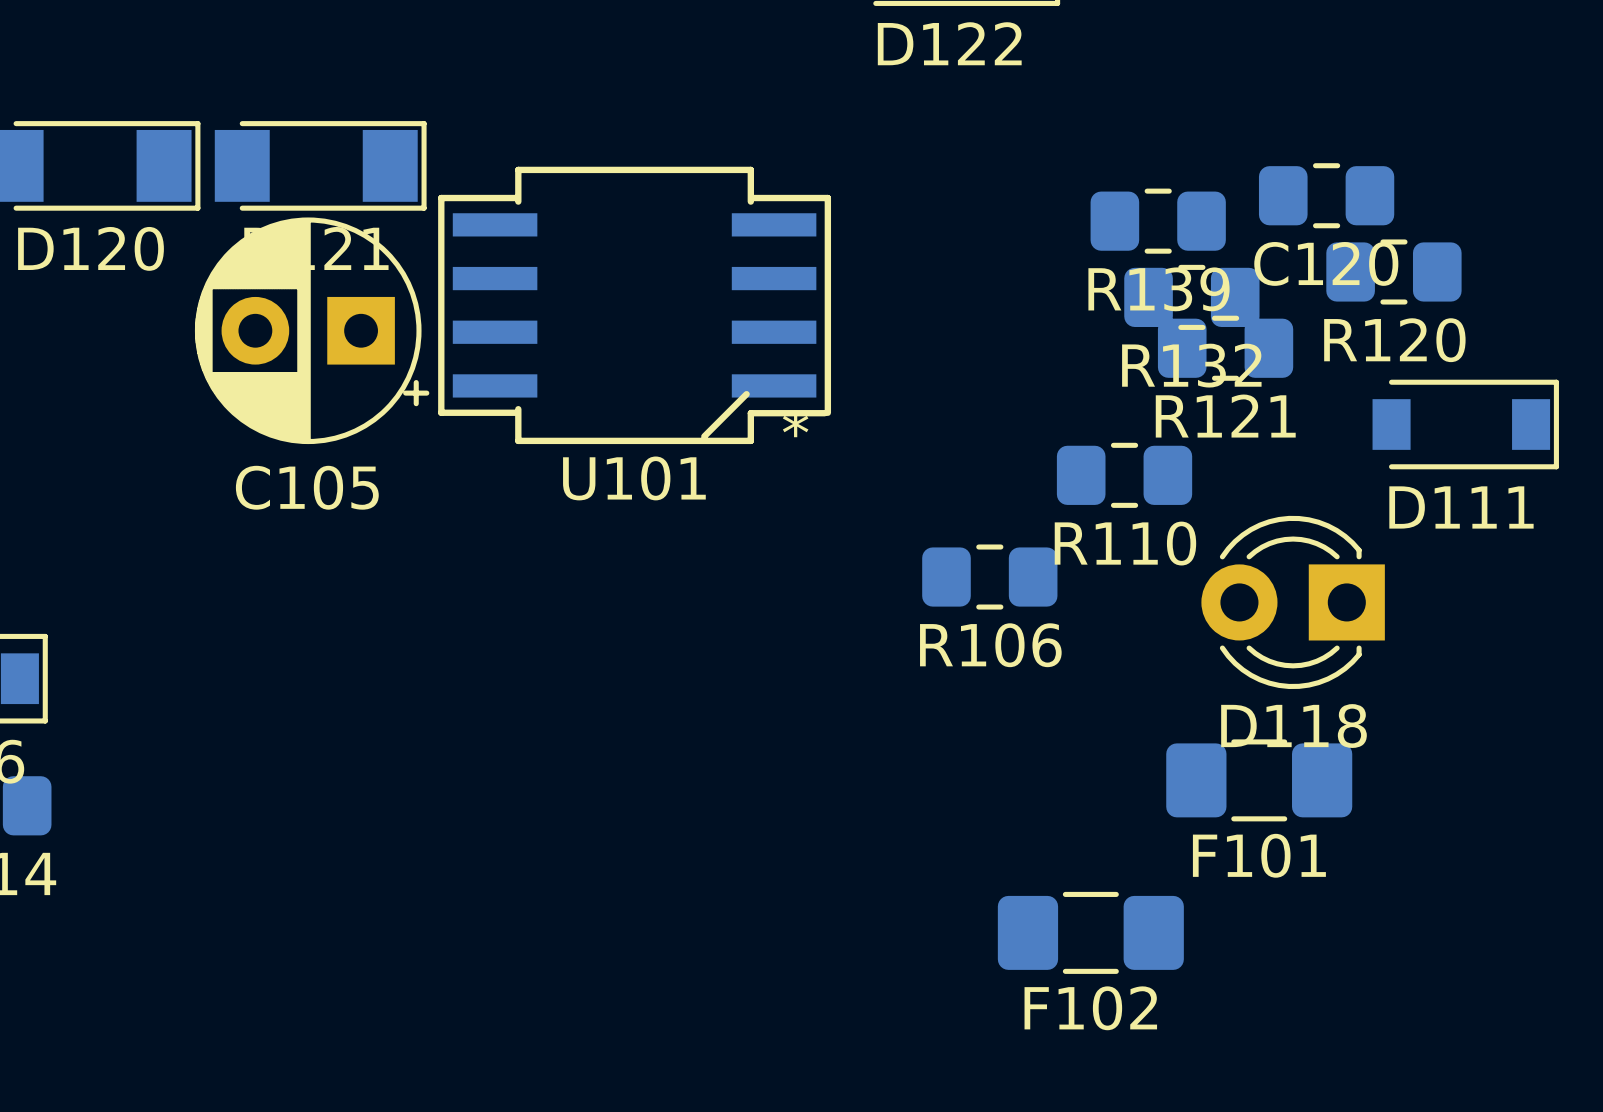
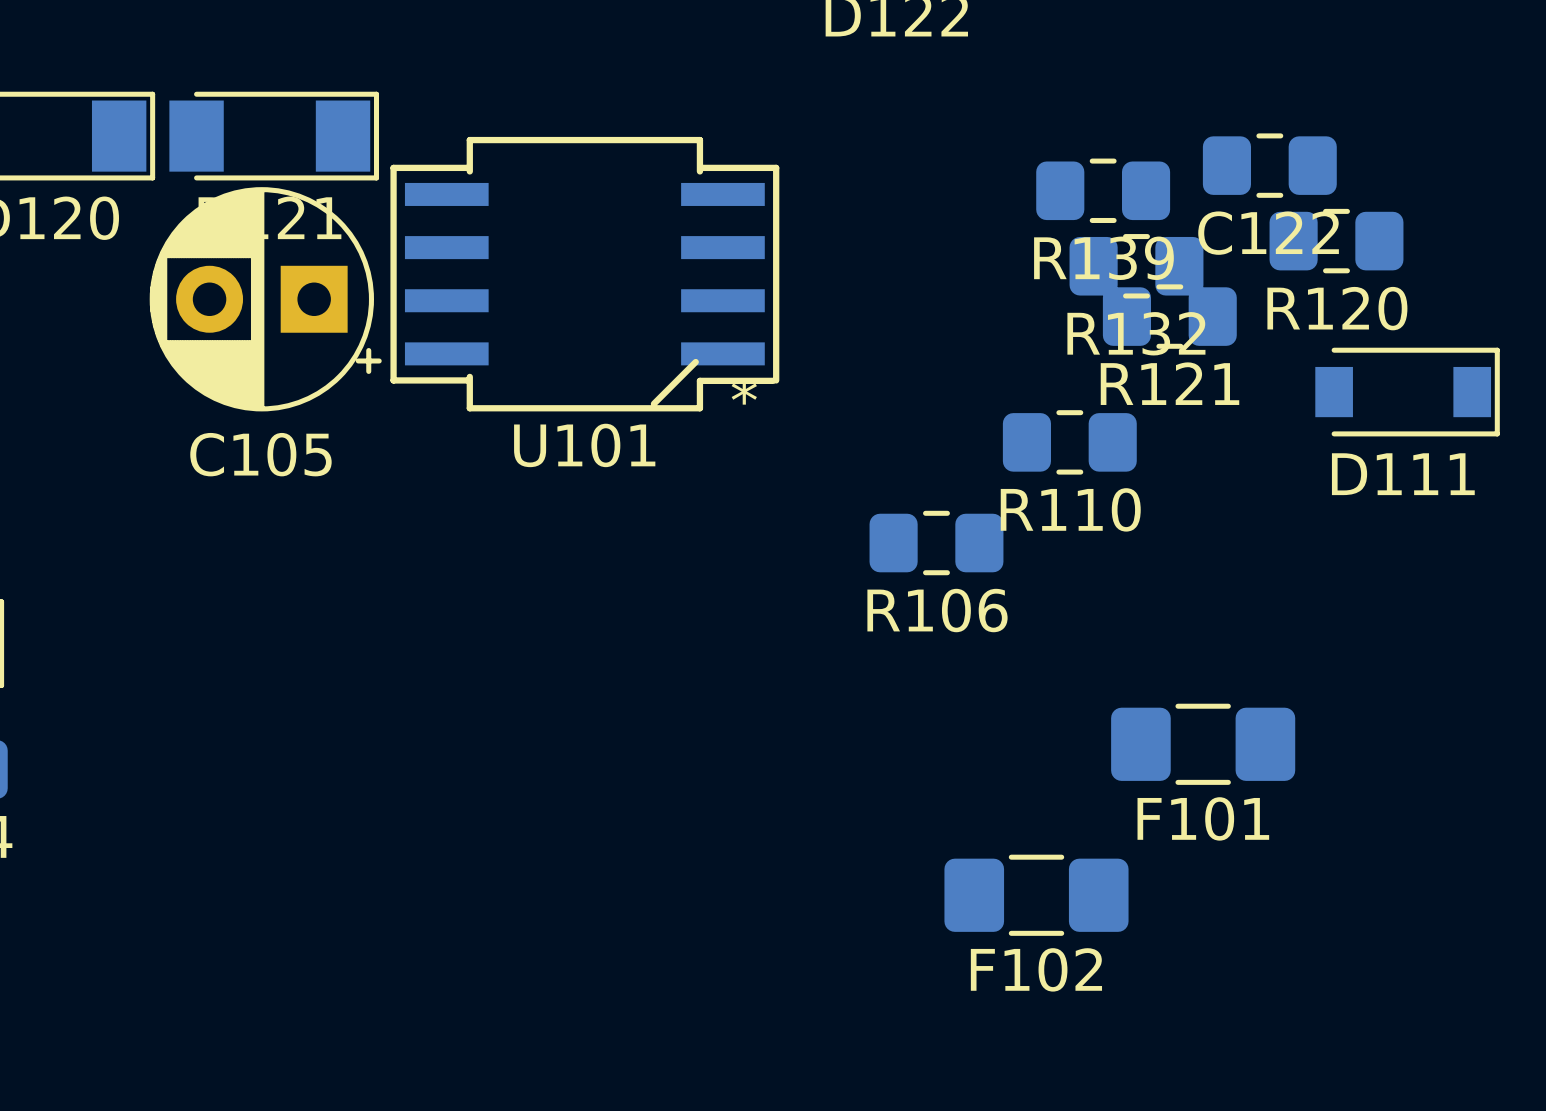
C120 name: C120 (1326, 263) -> C122 (1268, 233)
D118: (1293, 602) -> none

